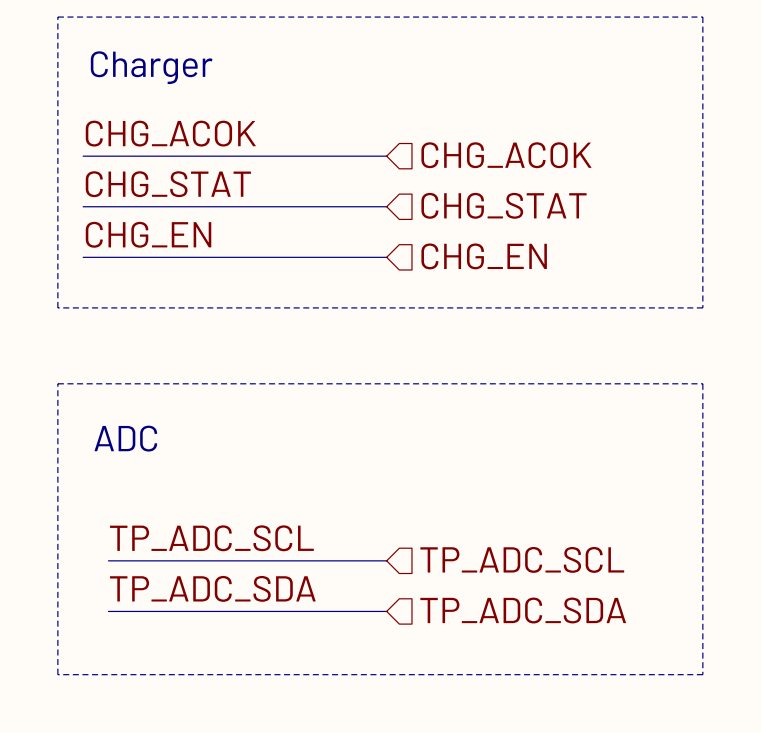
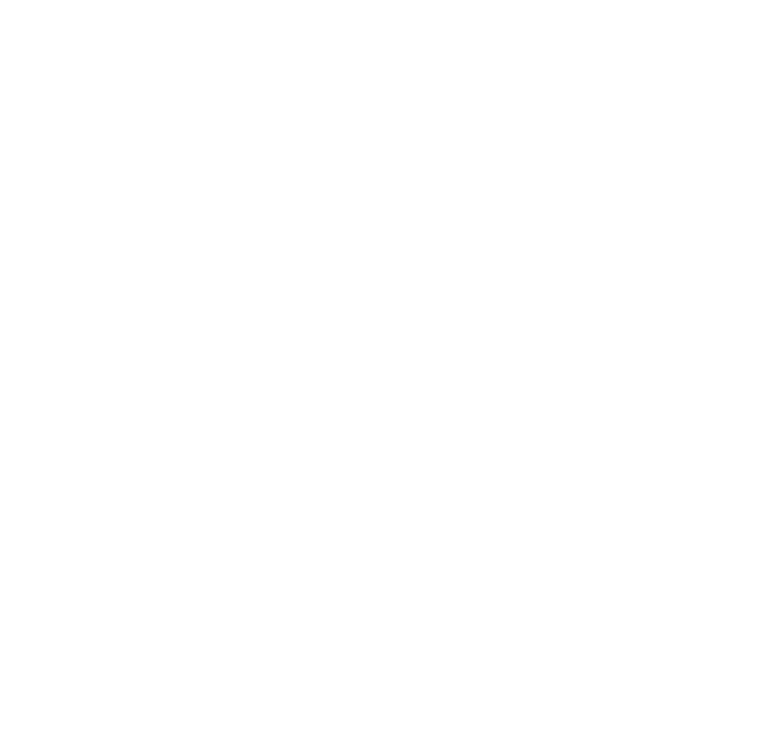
line: (57, 17) (702, 17) (702, 307) (57, 307) (57, 17) -> none
text: Charger (151, 67) -> none
label: CHG_ACOK (170, 133) -> none
hierarchical label: CHG_ACOK (506, 155) -> none
wire: (83, 156) (386, 156) -> none
label: CHG_STAT (168, 184) -> none
hierarchical label: CHG_STAT (504, 205) -> none
wire: (83, 206) (386, 206) -> none
label: CHG_EN (148, 234) -> none
hierarchical label: CHG_EN (484, 256) -> none
wire: (83, 257) (386, 257) -> none
line: (57, 383) (57, 674) (702, 674) (702, 383) (57, 383) -> none
text: ADC (125, 438) -> none
label: TP_ADC_SCL (211, 538) -> none
hierarchical label: TP_ADC_SCL (522, 559) -> none
wire: (108, 560) (386, 560) -> none
label: TP_ADC_SDA (212, 588) -> none
hierarchical label: TP_ADC_SDA (523, 610) -> none
wire: (108, 611) (386, 611) -> none

